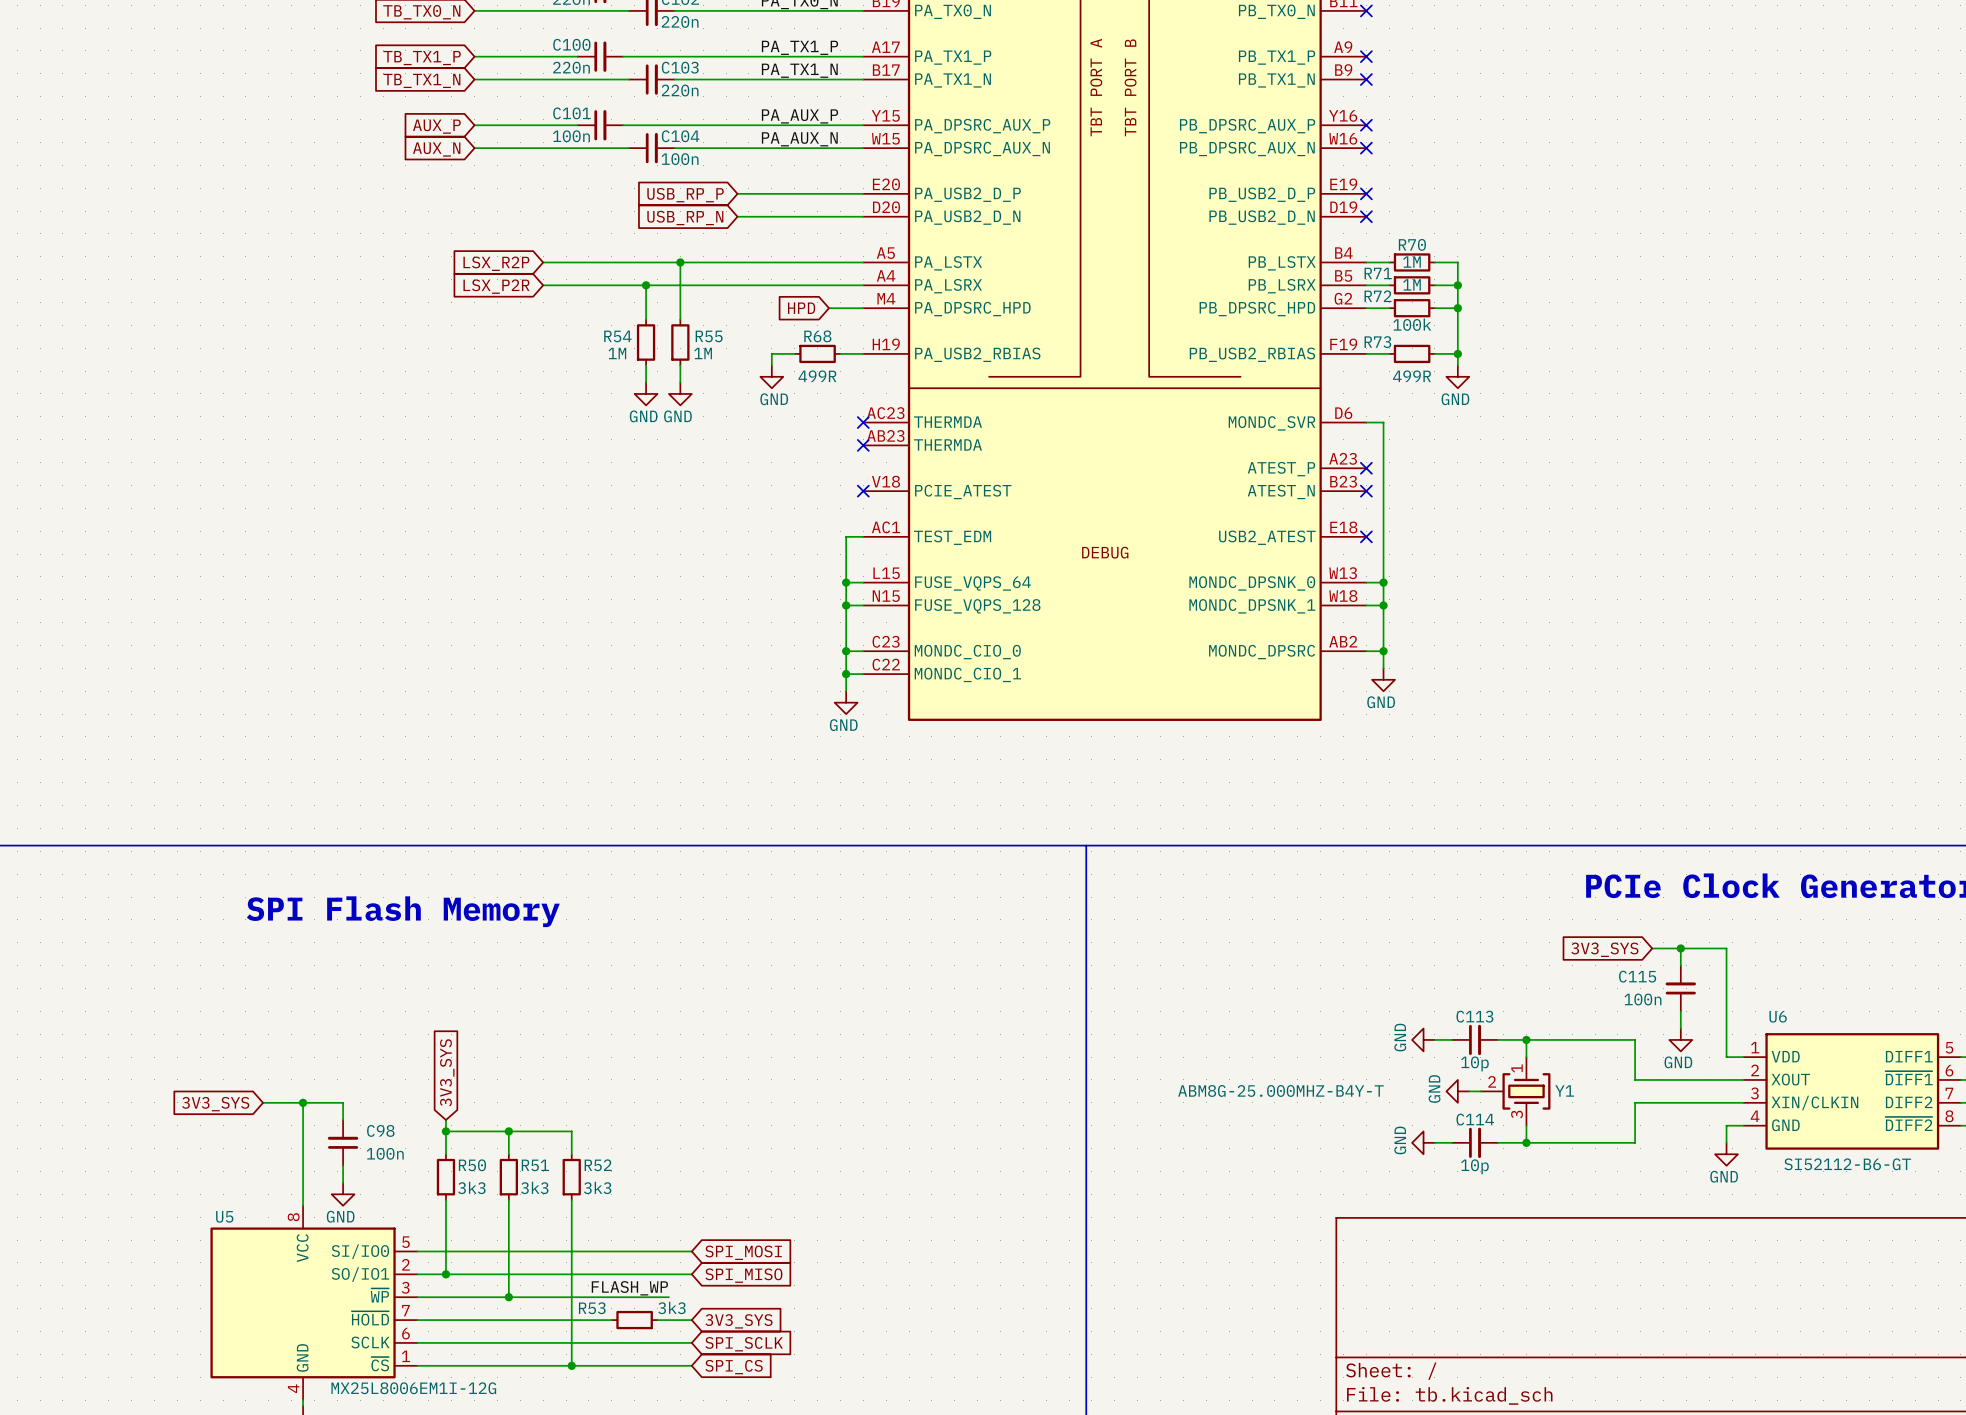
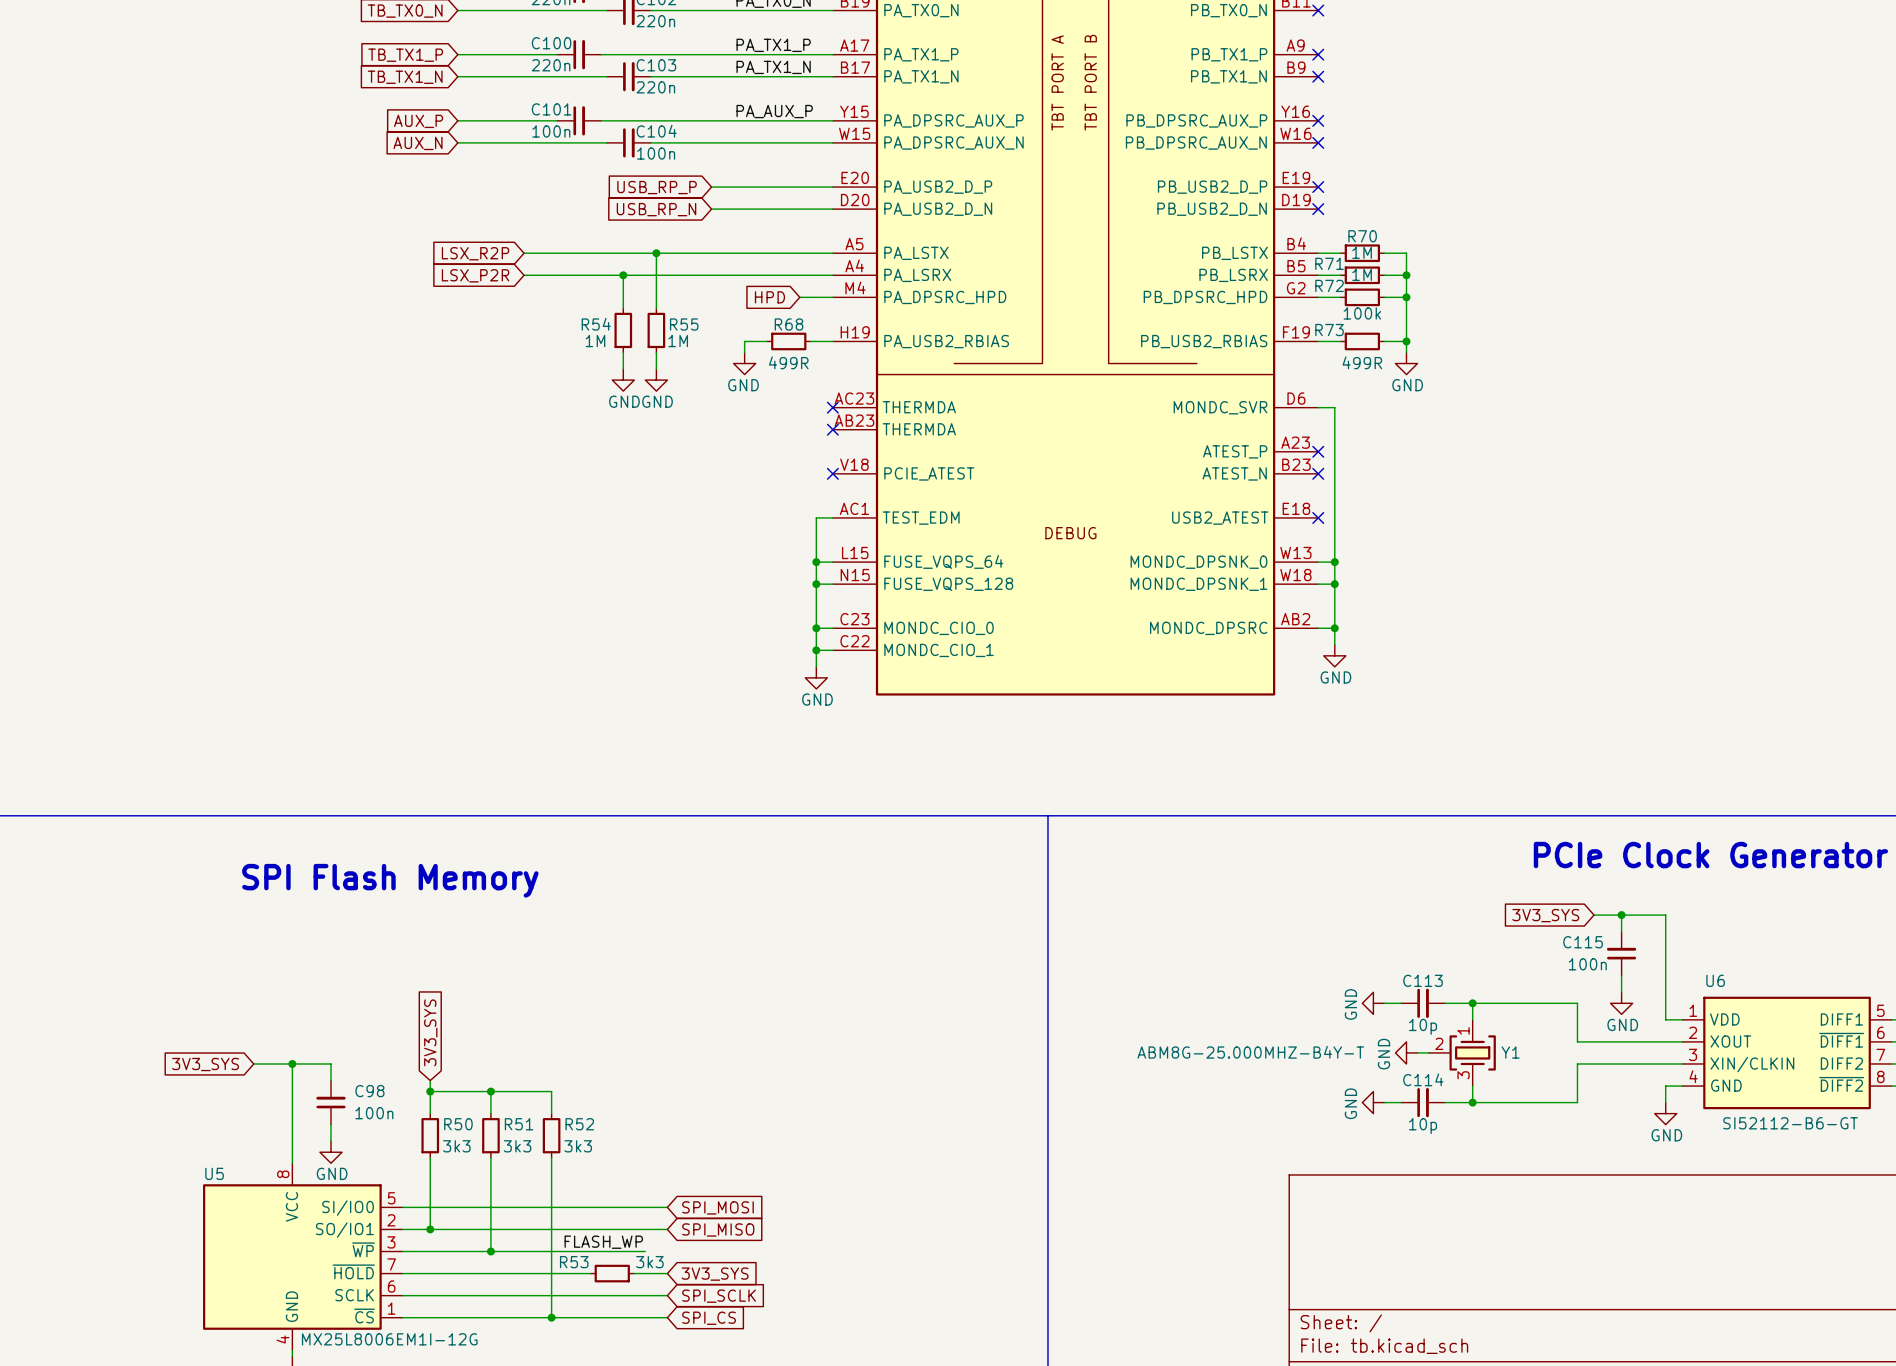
label: PA_AUX_N (799, 139) -> none

